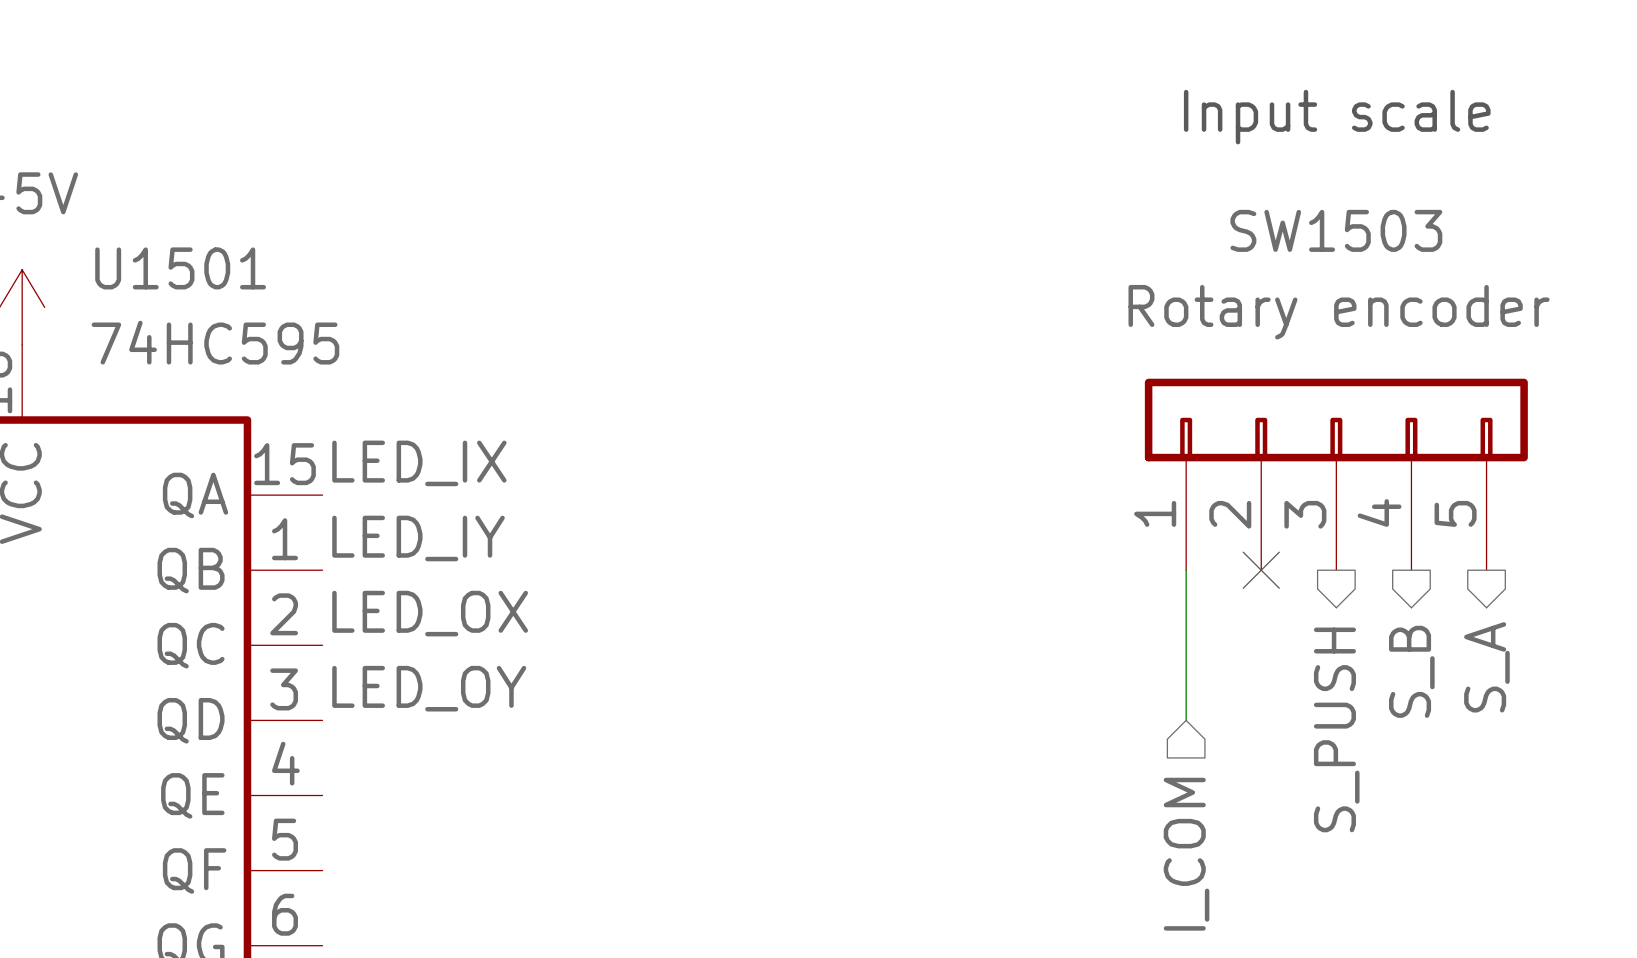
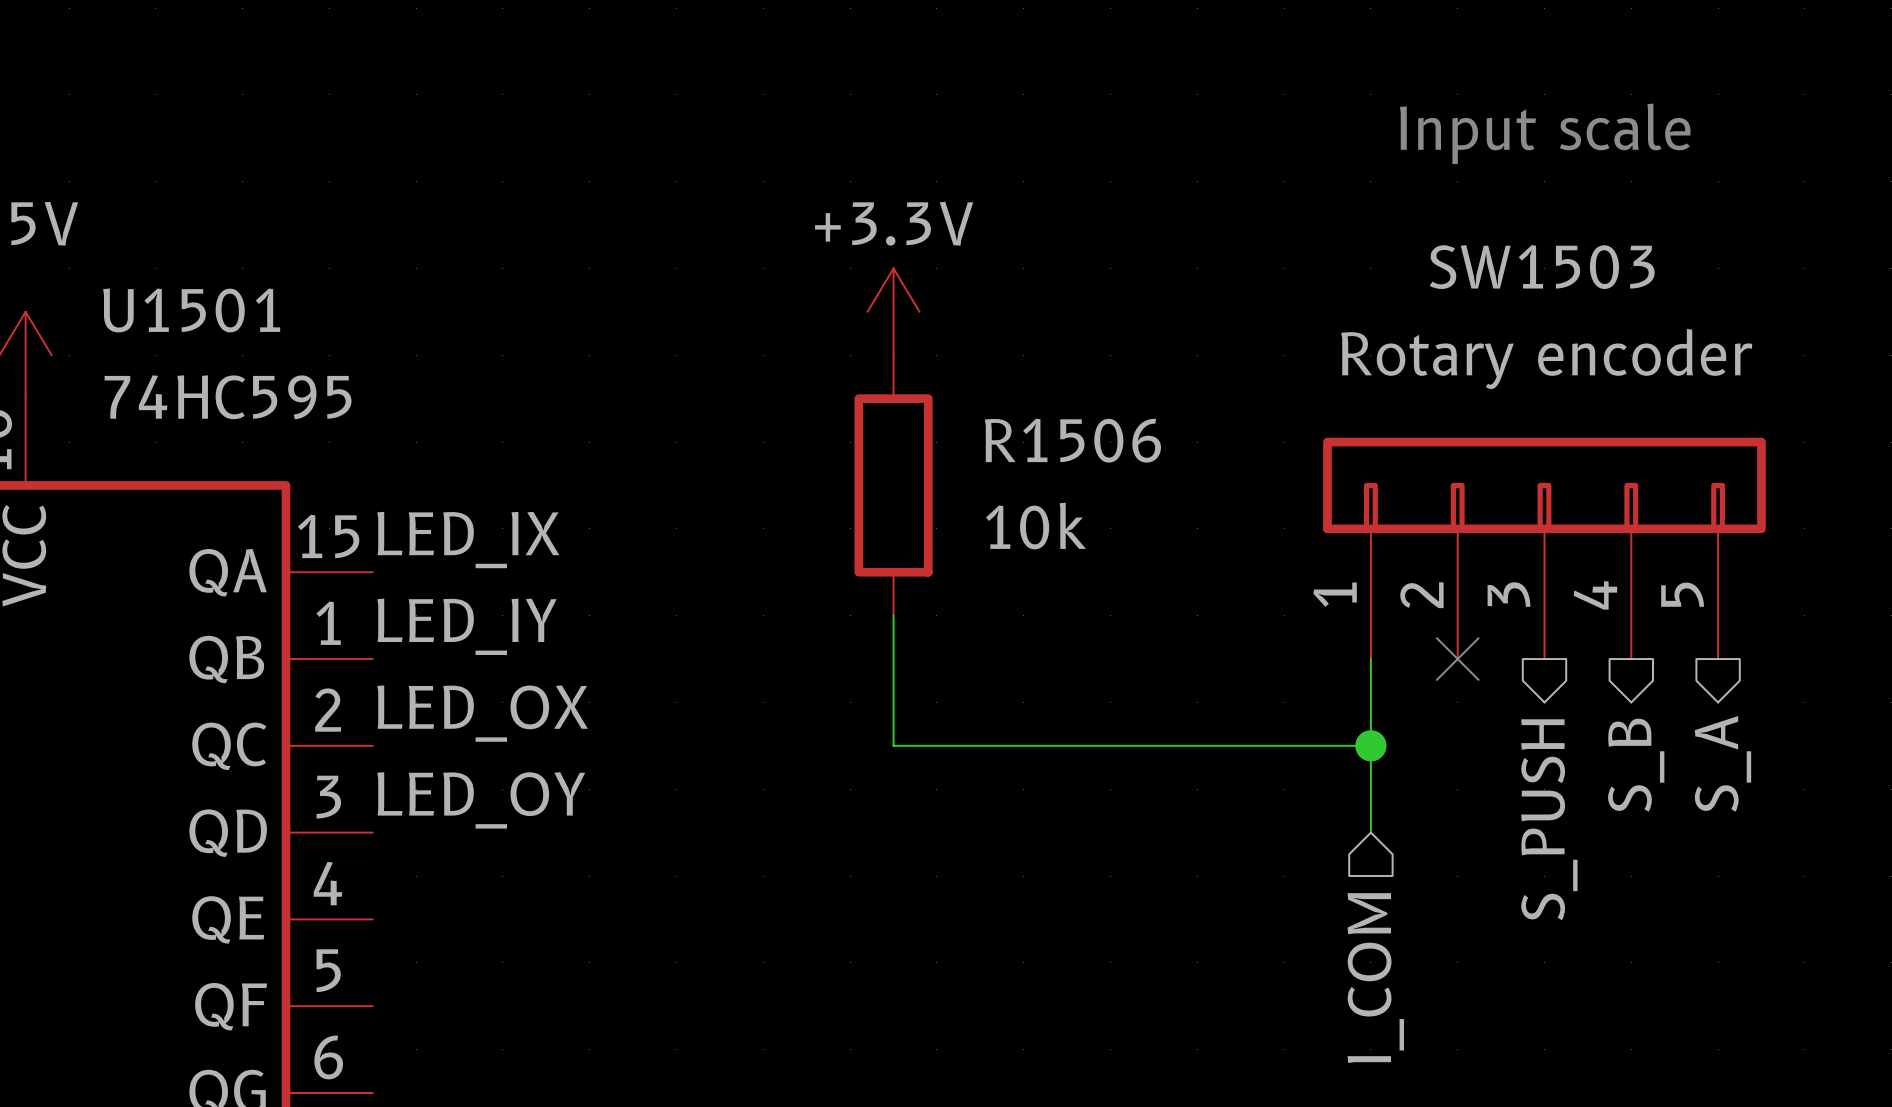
power symbol: none -> +3.3V (893, 311)
R1506: none -> 10k (893, 485)
wire: none -> (893, 615) (893, 745) (1370, 745)
junction: none -> (1370, 745)

